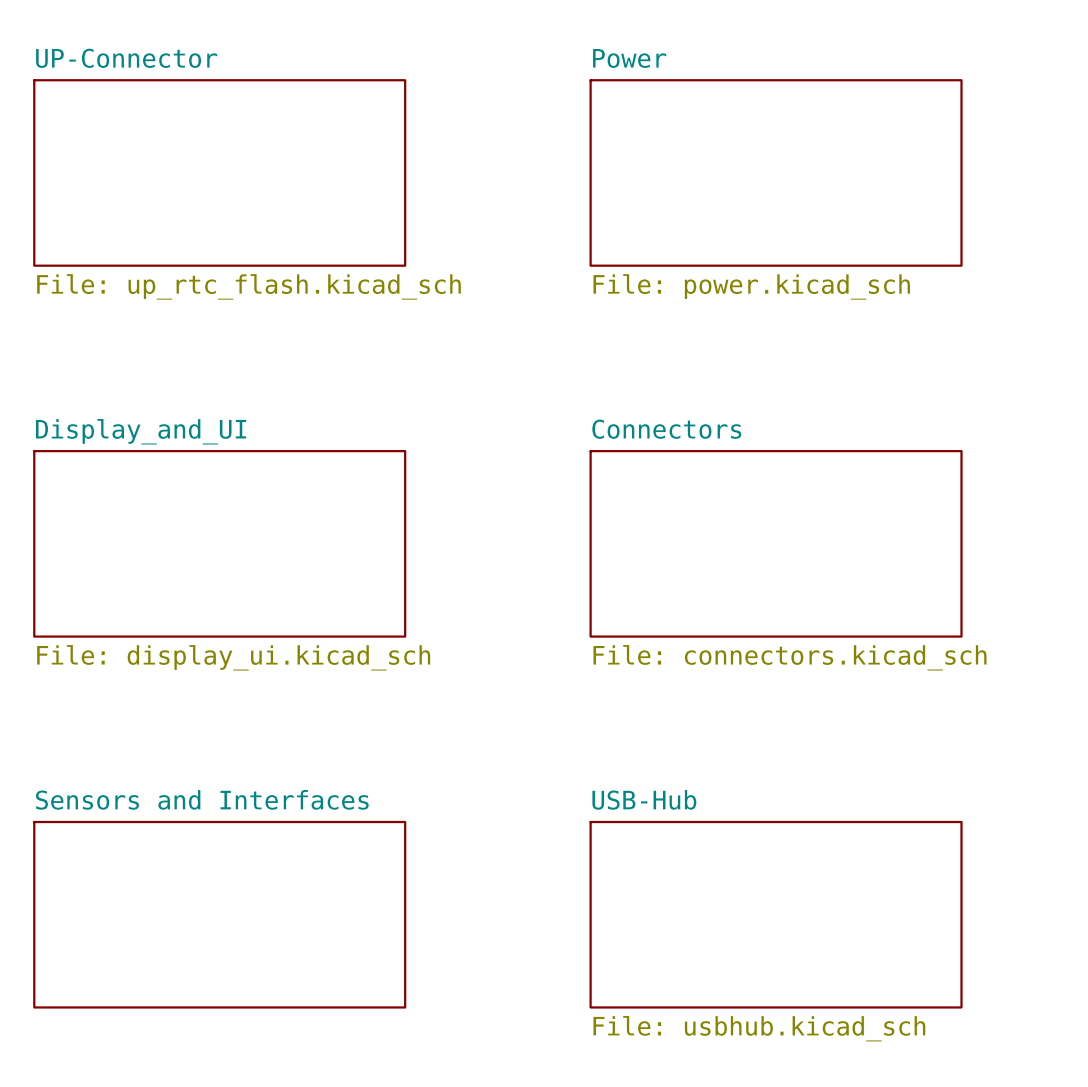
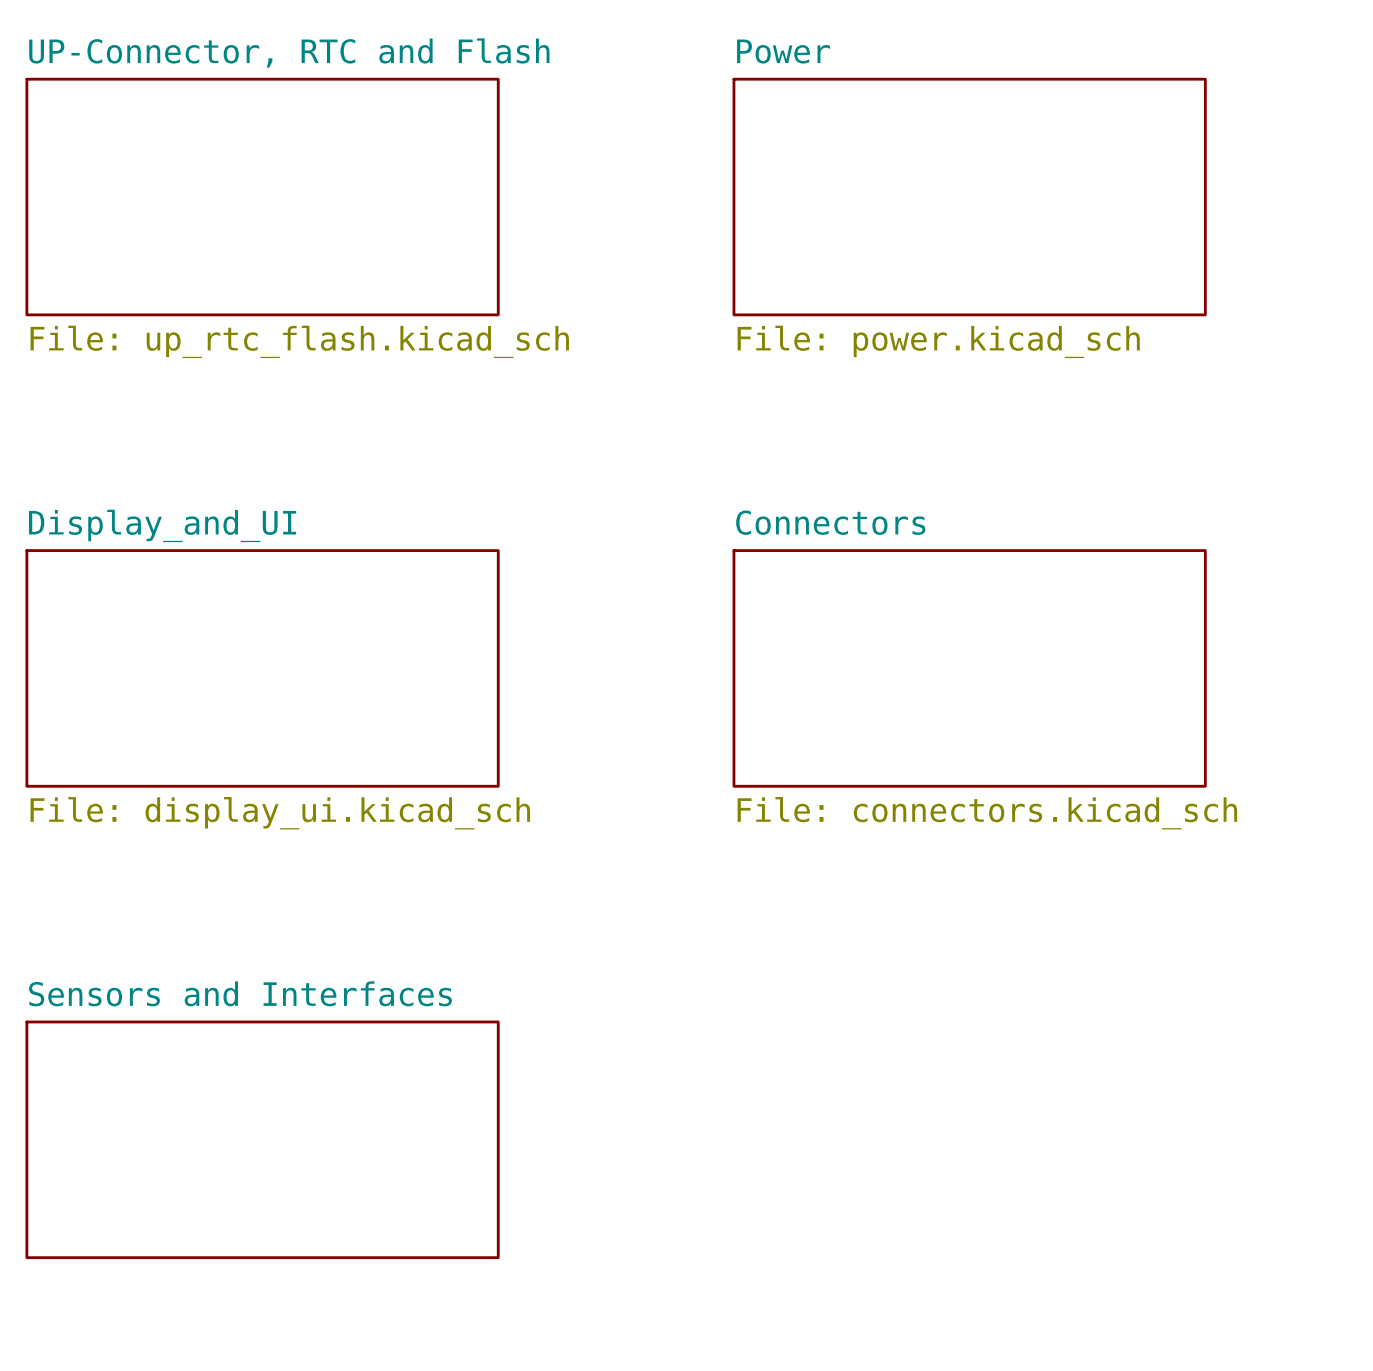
sheet UP-Connector name: UP-Connector (126, 58) -> UP-Connector, RTC and Flash (289, 53)
sheet USB-Hub: File: usbhub.kicad_sch (776, 914) -> none

